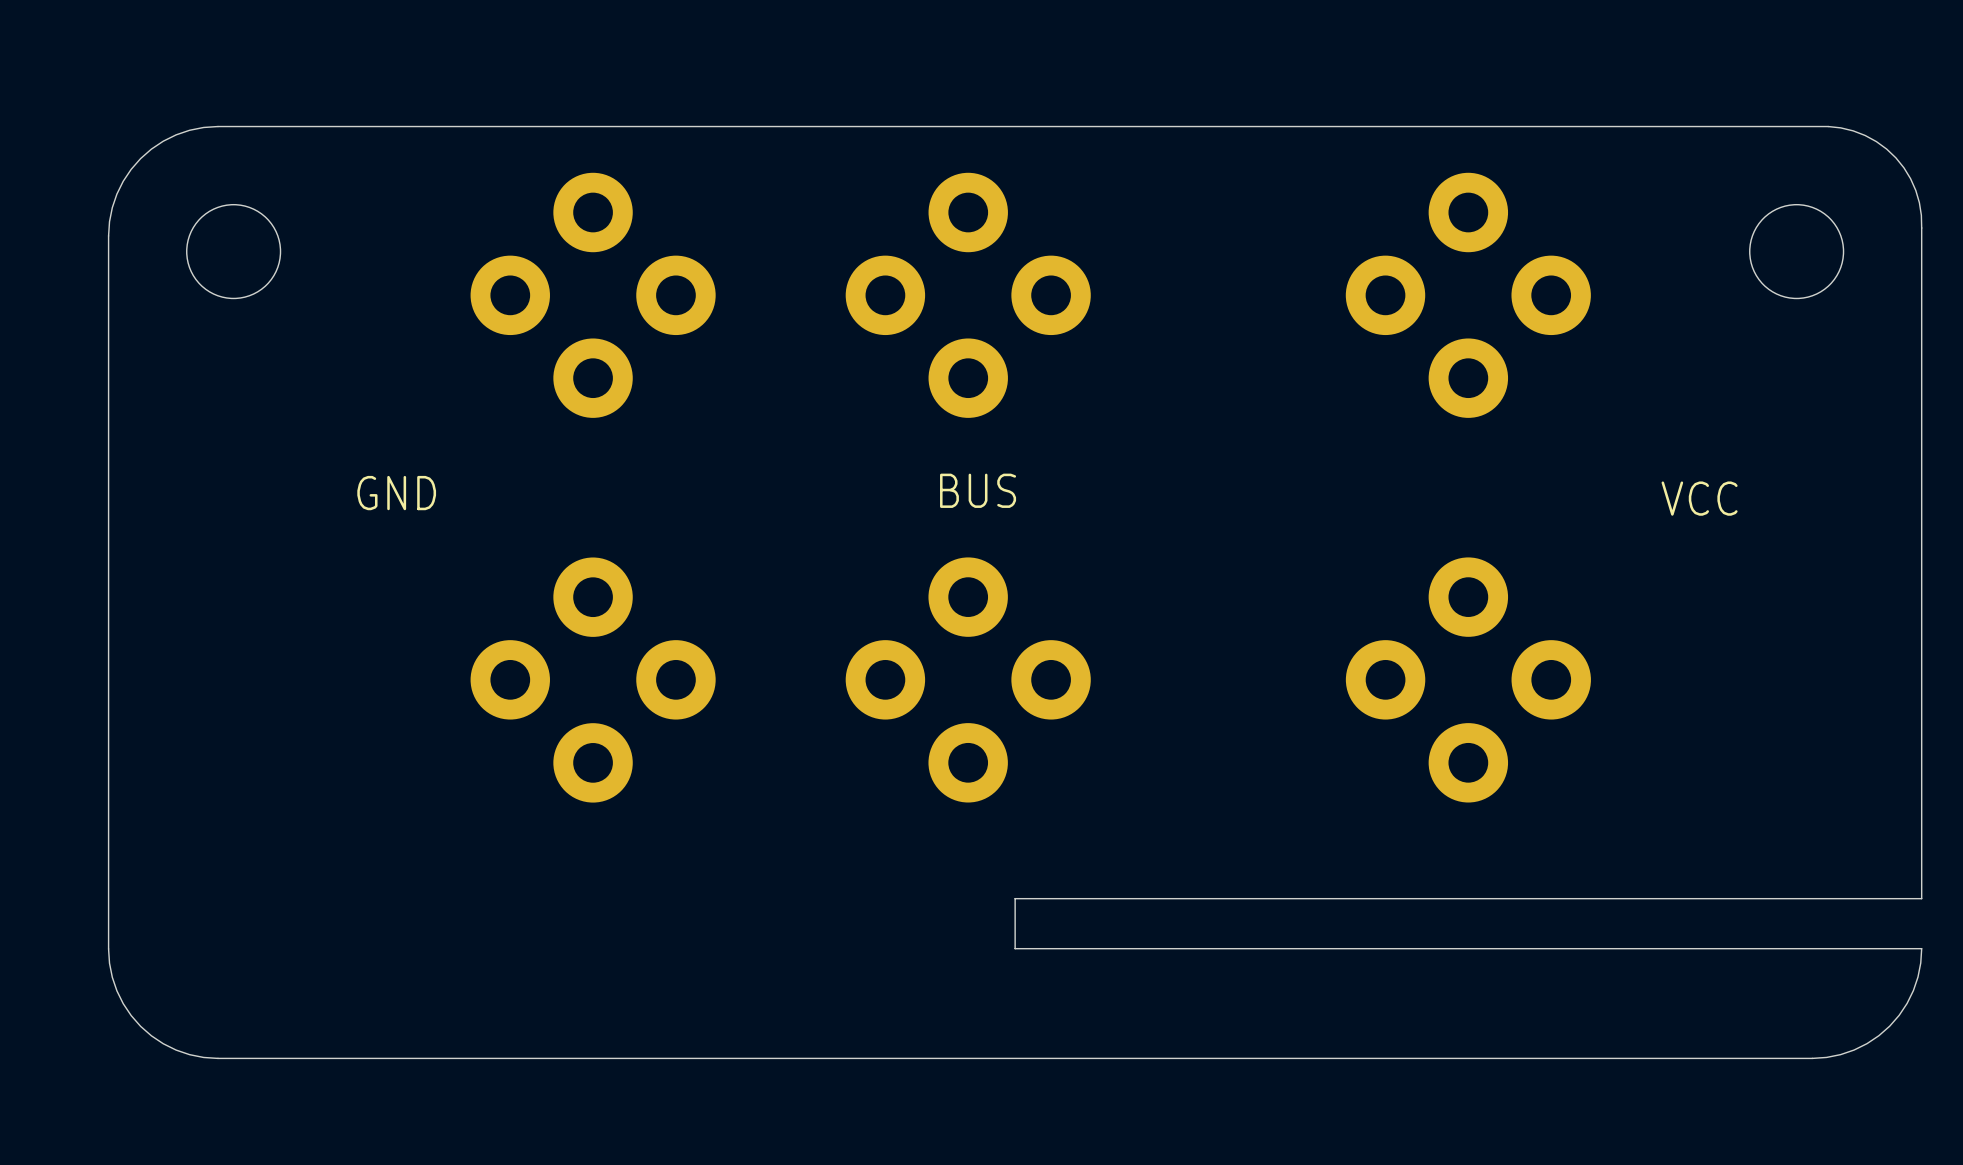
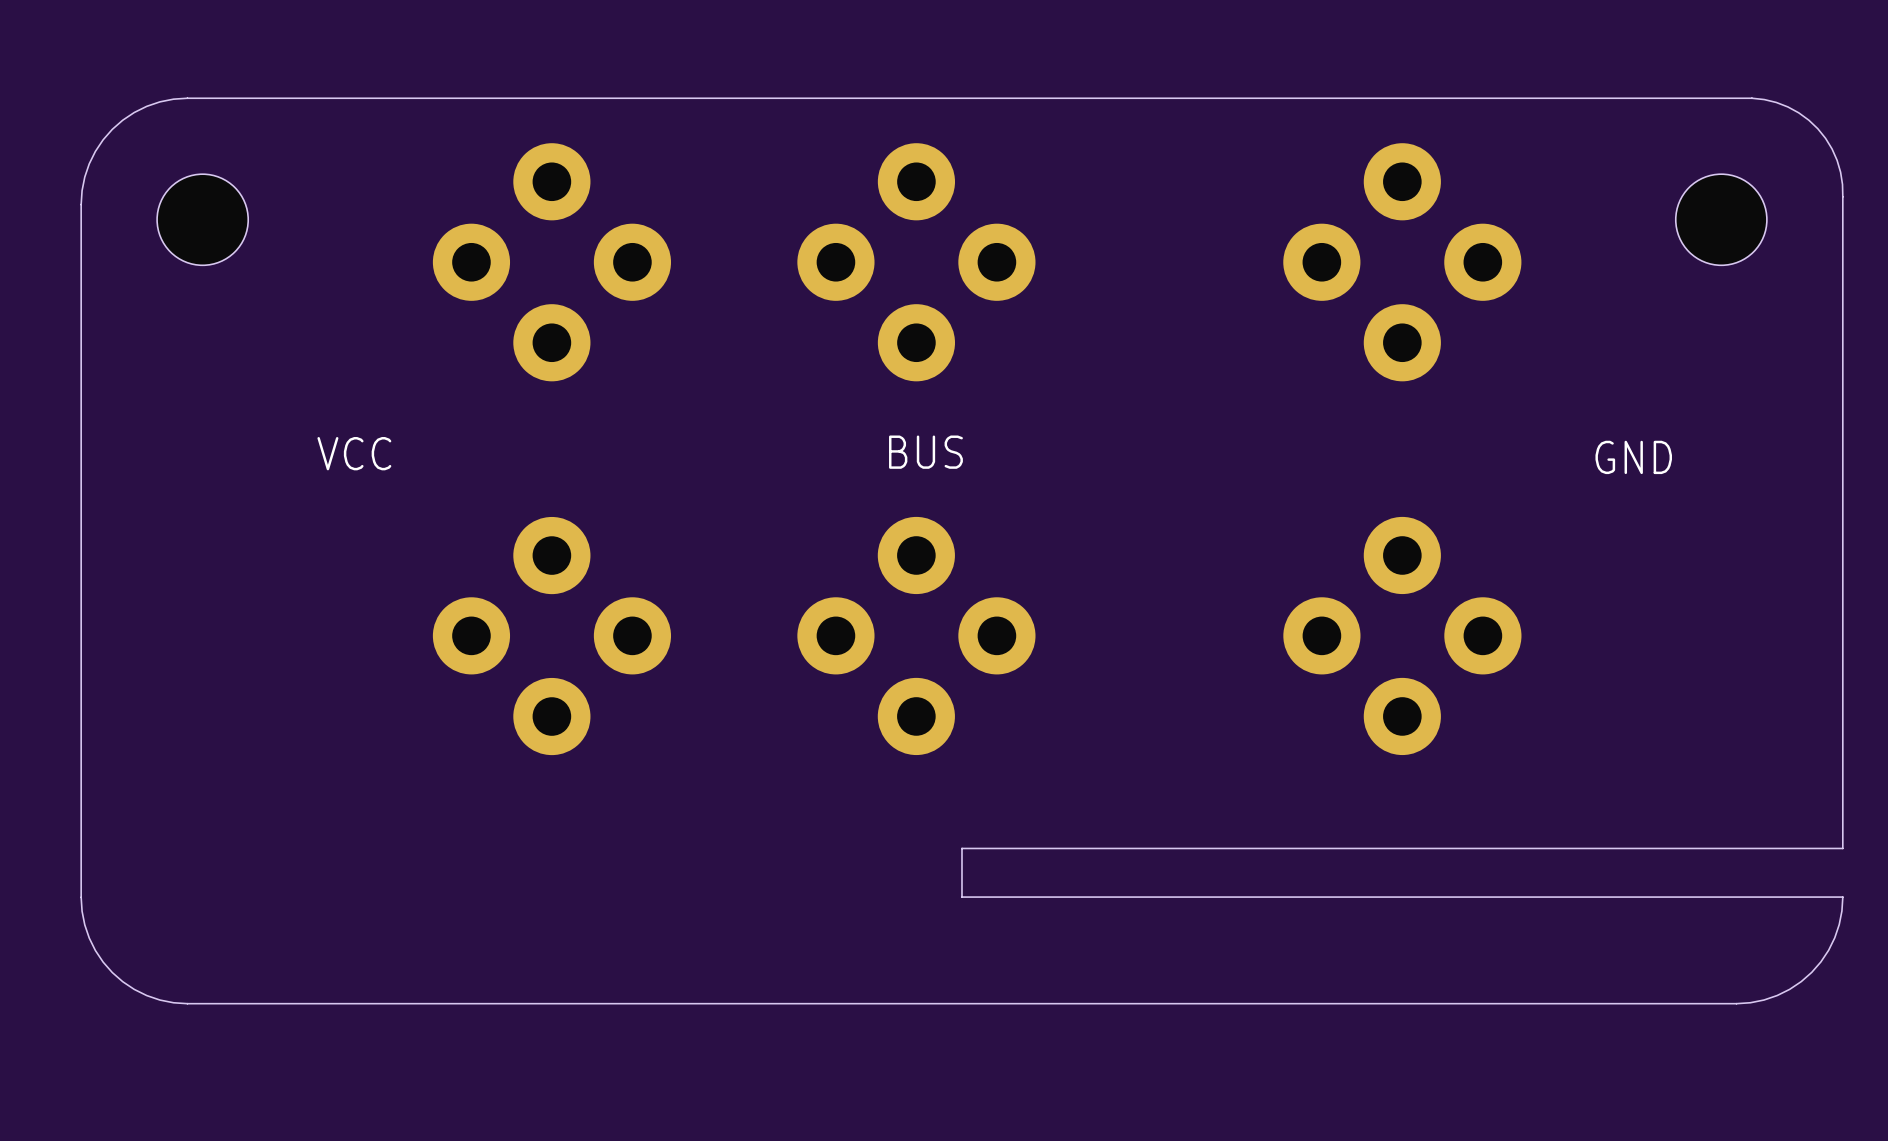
text: GND (396, 493) -> VCC (354, 453)
text: VCC (1699, 498) -> GND (1633, 457)

